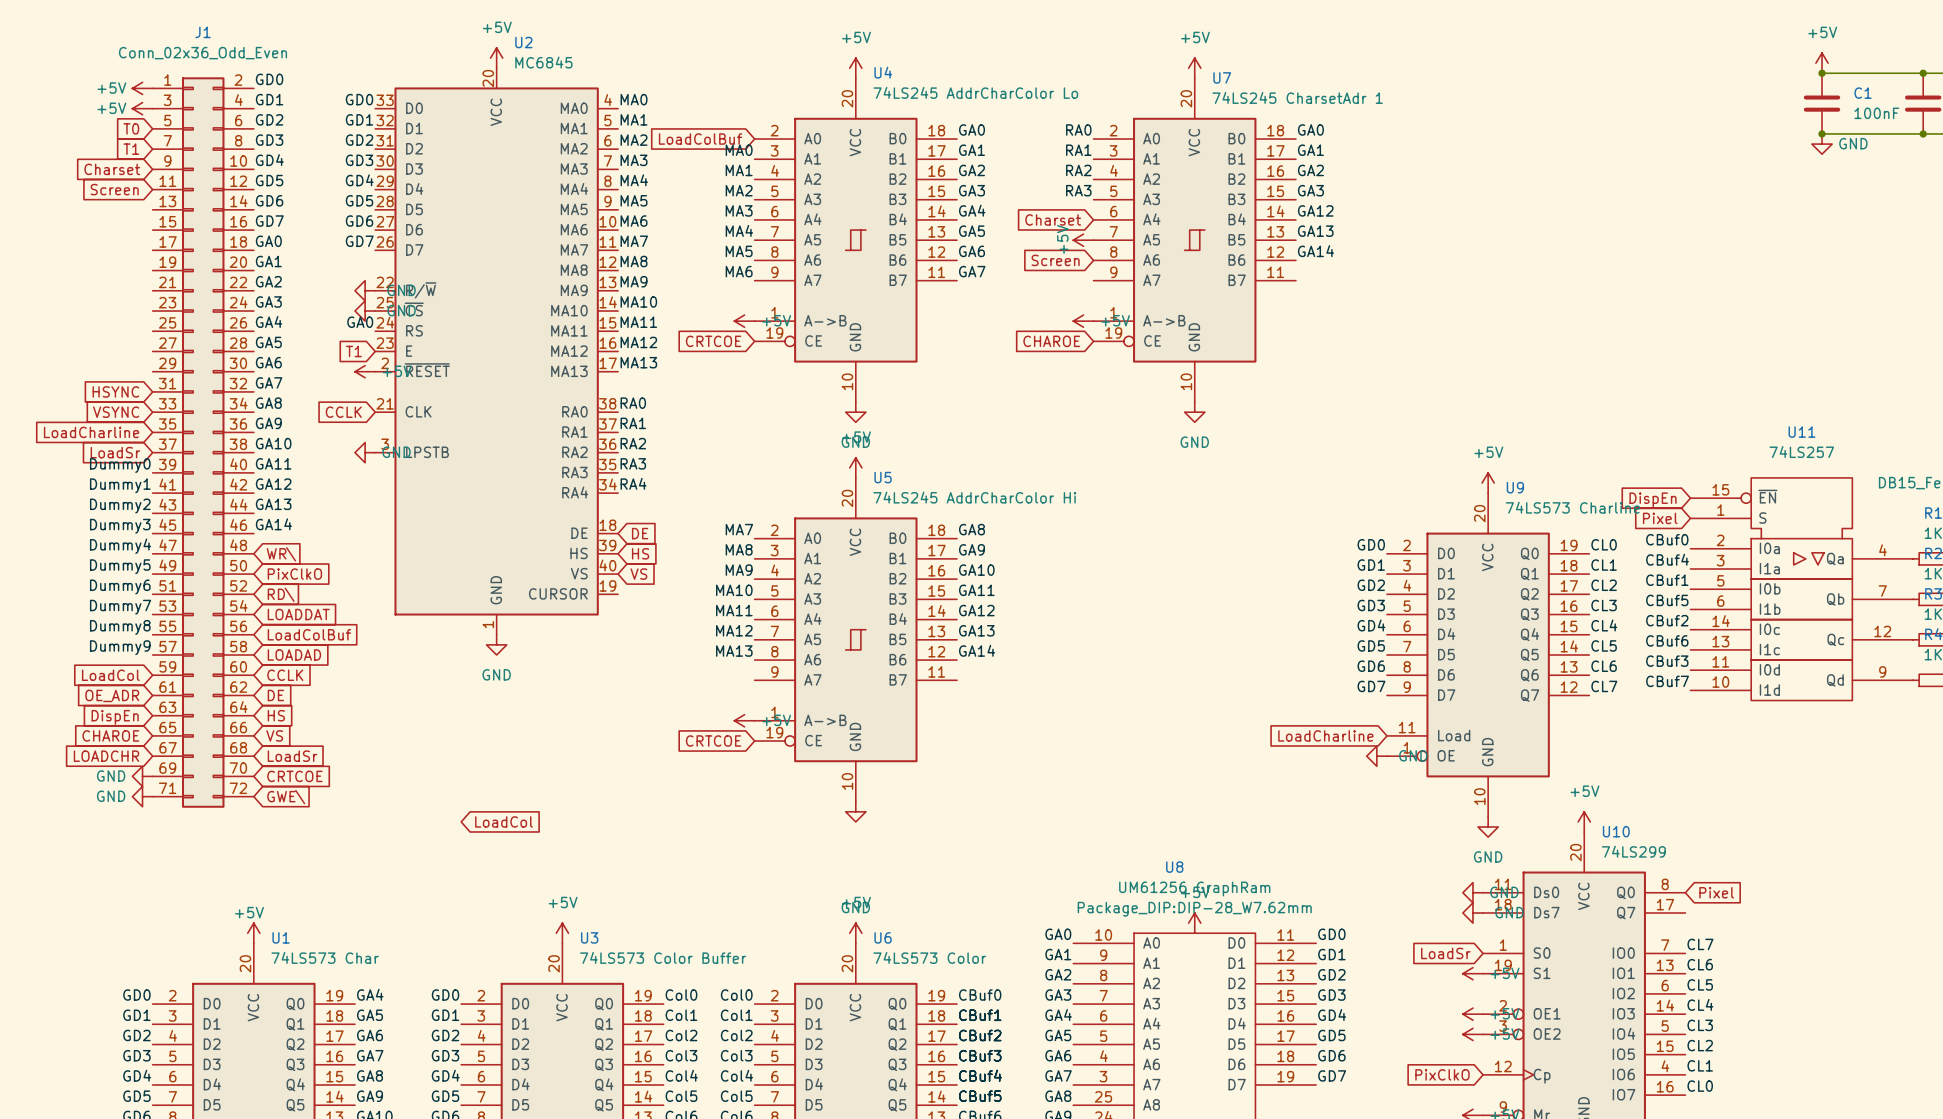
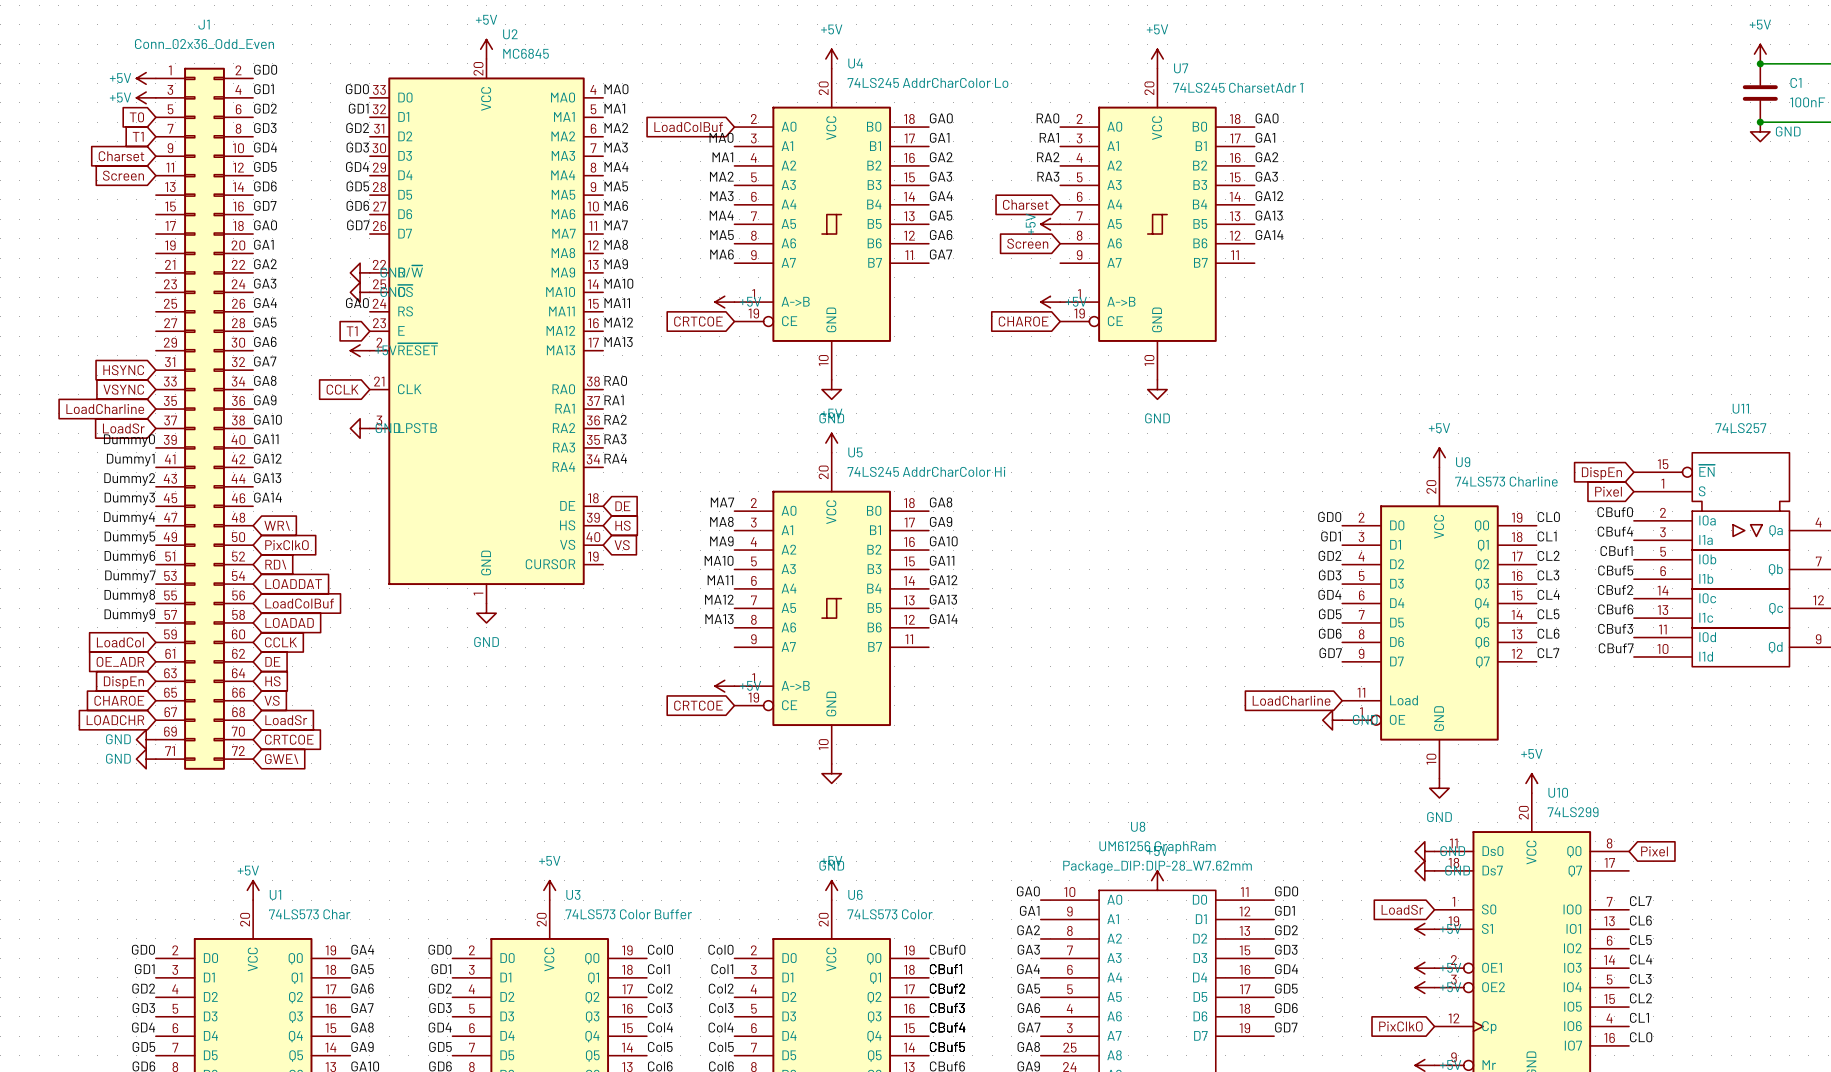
global label: LoadCol (504, 821) -> none

